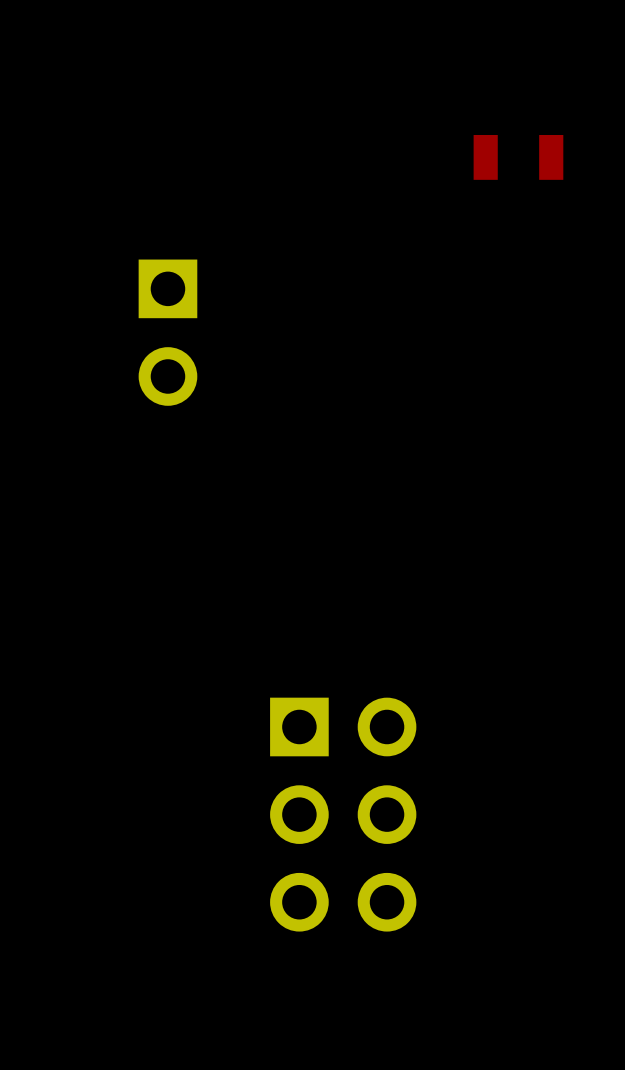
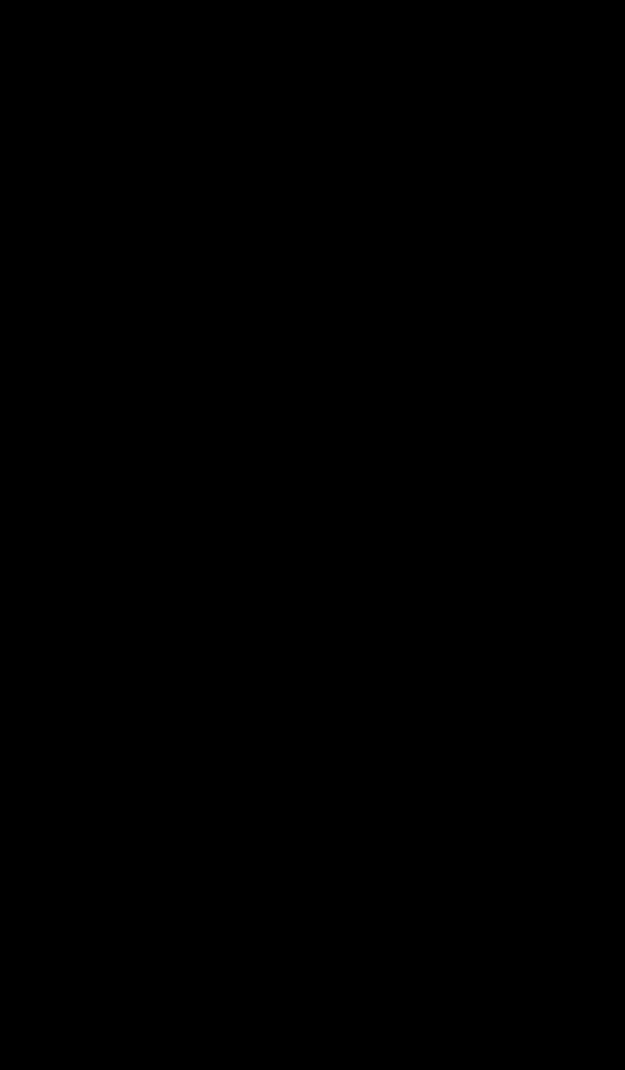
part: (518, 157) -> none
part: (167, 332) -> none
part: (343, 814) -> none

